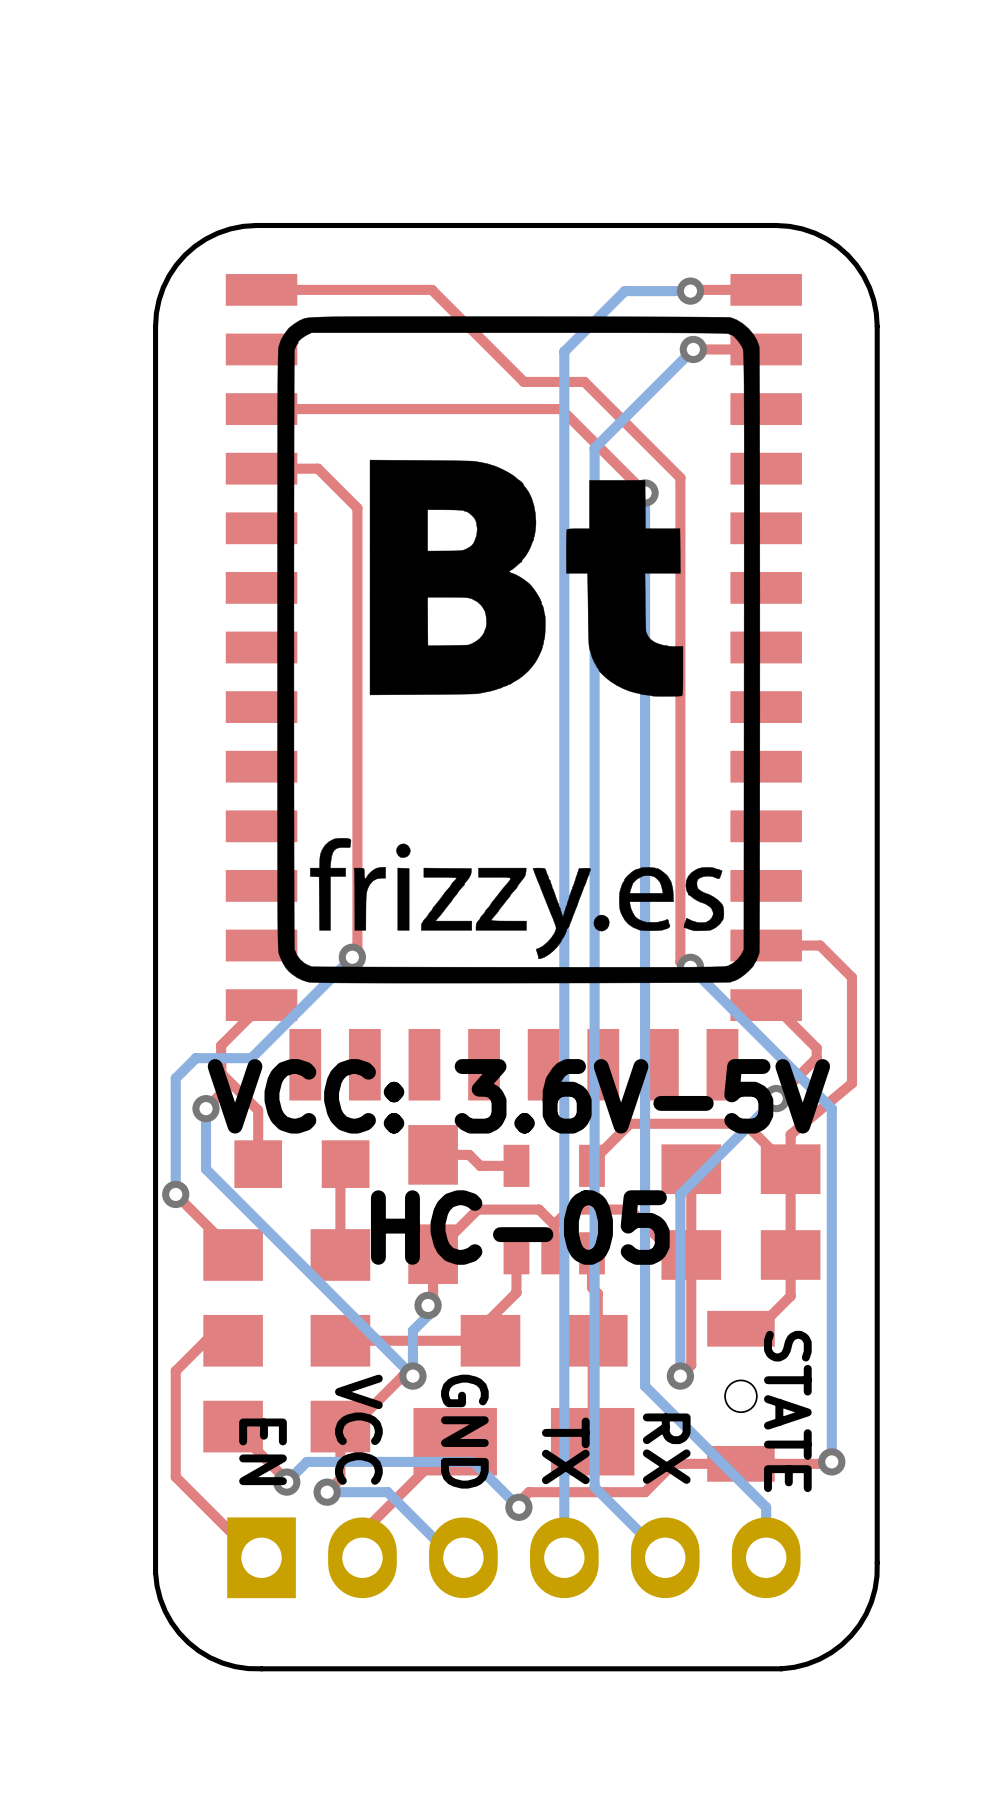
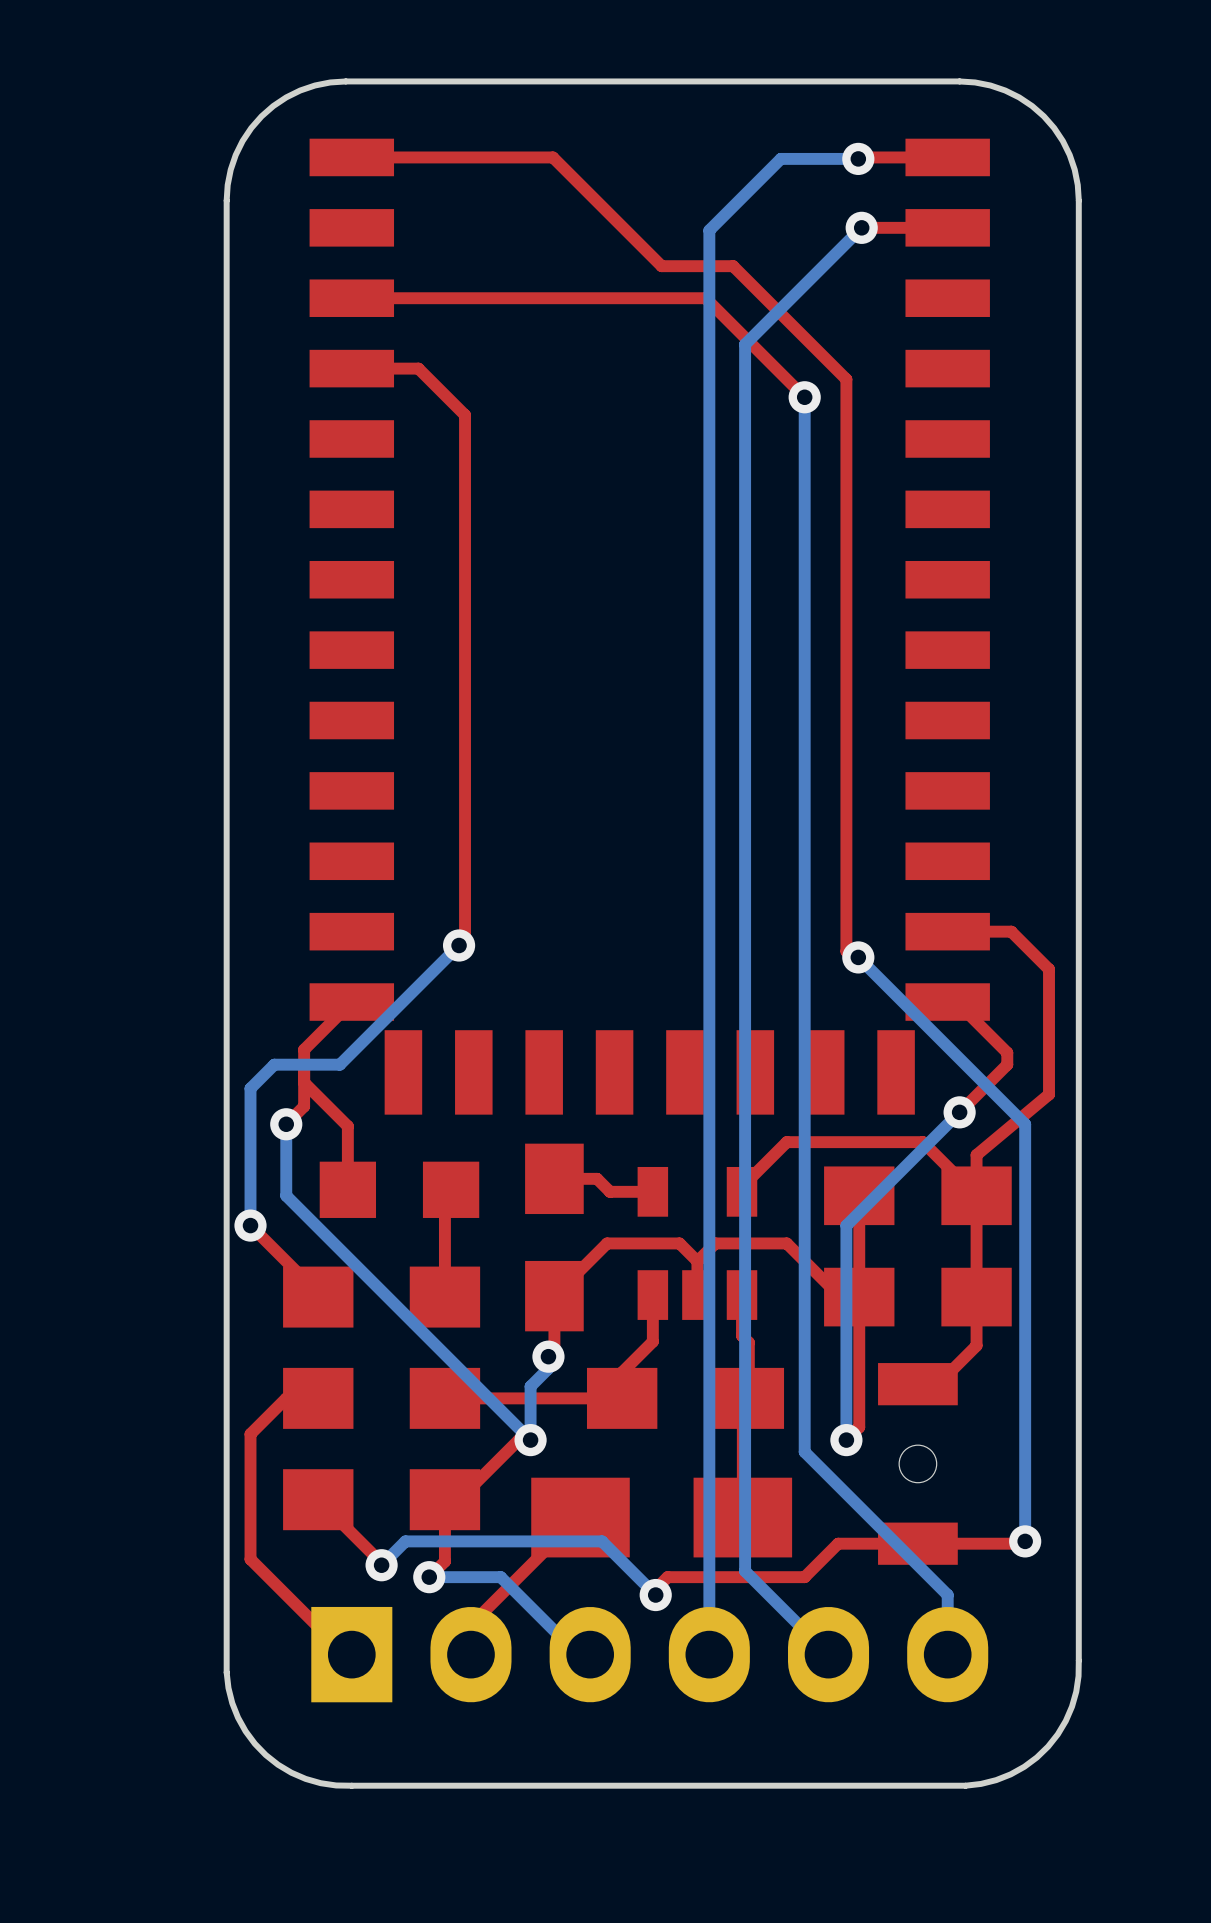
drawing: [277, 316, 761, 984] -> none
text: VCC: 3.6V-5V (518, 1096) -> none
text: HC-05 (520, 1227) -> none
text: STATE (787, 1411) -> none
text: VCC (358, 1429) -> none
text: GND (464, 1431) -> none
text: RX (666, 1448) -> none
text: TX (565, 1450) -> none
text: EN (263, 1451) -> none

